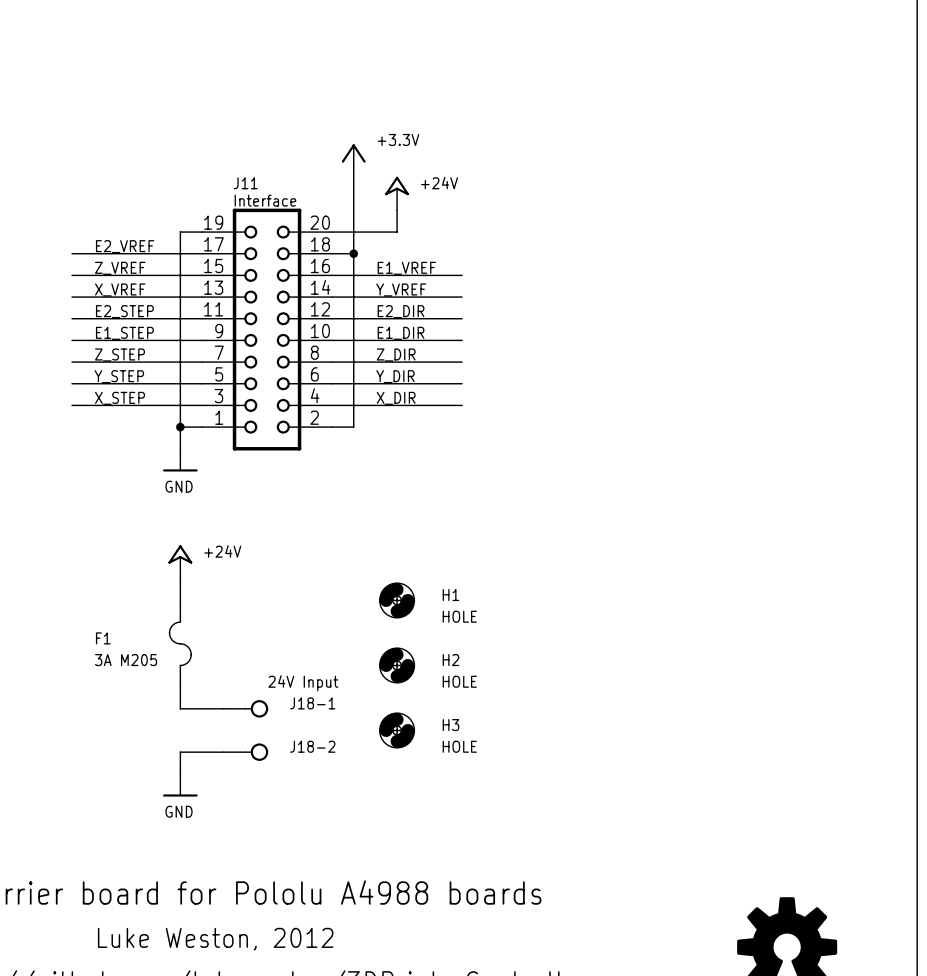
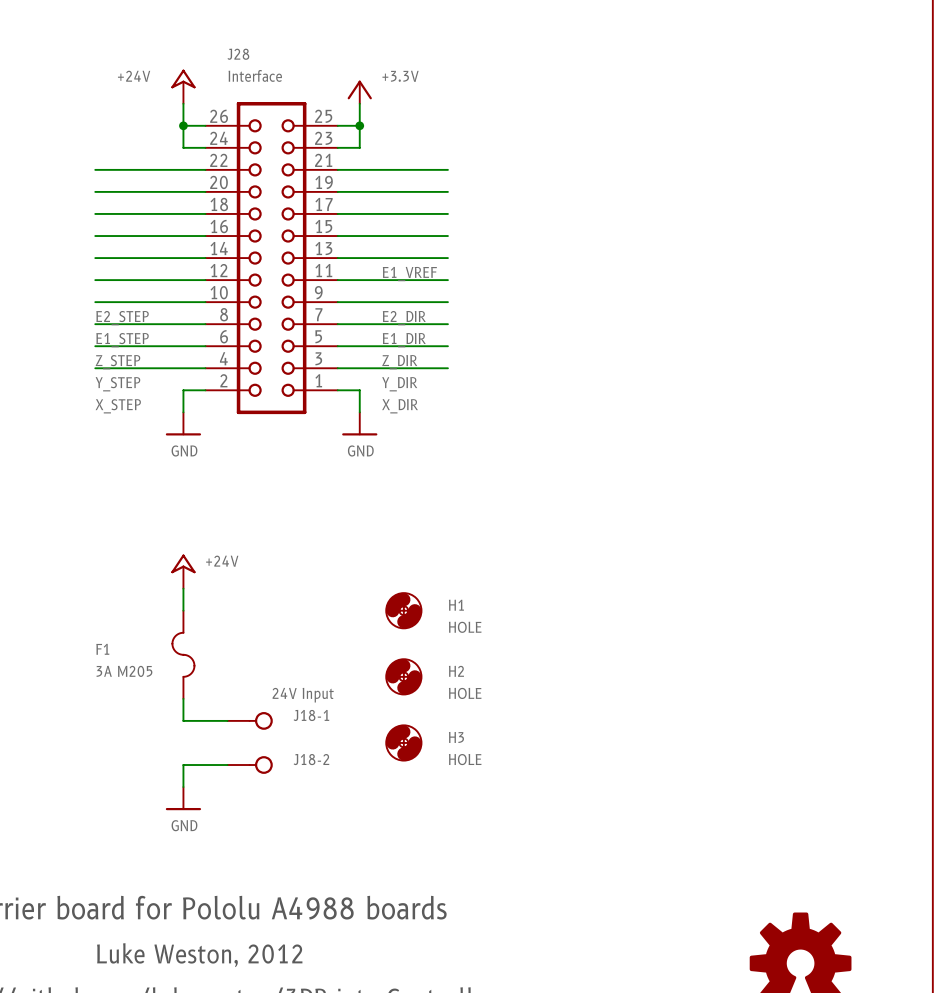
power symbol: none -> +24V (183, 86)
wire: none -> (183, 103) (183, 147) (205, 147)
wire: none -> (359, 103) (359, 147) (337, 147)
junction: none -> (183, 125)
junction: none -> (359, 125)
power symbol position: +3.3V (353, 155) -> +3.3V (359, 92)
wire: none -> (95, 169) (205, 169)
wire: none -> (337, 169) (447, 169)
wire: (353, 167) (353, 383) (462, 383) -> none
wire: none -> (95, 191) (205, 191)
wire: none -> (337, 191) (447, 191)
power symbol: +24V (397, 193) -> none
wire: none -> (95, 213) (205, 213)
wire: none -> (337, 213) (447, 213)
wire: (397, 210) (397, 232) -> (447, 236) (403, 236)
wire: (180, 232) (180, 383) (72, 383) -> (183, 236) (95, 236)
label: E2_VREF (125, 246) -> none
wire: (72, 253) (93, 253) -> (183, 125) (205, 125)
J28: none -> Interface (271, 258)
wire: none -> (359, 258) (447, 258)
junction: (353, 253) -> none
label: Z_VREF (120, 268) -> none
wire: (72, 275) (93, 275) -> none
wire: (440, 275) (462, 275) -> (337, 125) (359, 125)
label: X_VREF (120, 289) -> none
label: Y_VREF (401, 289) -> none
wire: (72, 297) (93, 297) -> none
wire: (440, 297) (462, 297) -> none
wire: (72, 318) (93, 318) -> none
wire: (440, 318) (462, 318) -> none
J11: Interface (267, 329) -> none
wire: (72, 340) (93, 340) -> none
wire: (440, 340) (462, 340) -> none
wire: (72, 362) (93, 362) -> none
wire: (440, 362) (462, 362) -> none
wire: (72, 405) (202, 405) -> none
wire: (332, 405) (462, 405) -> none
power symbol: none -> GND (359, 423)
junction: (180, 427) -> none
power symbol position: GND (180, 460) -> GND (183, 423)

